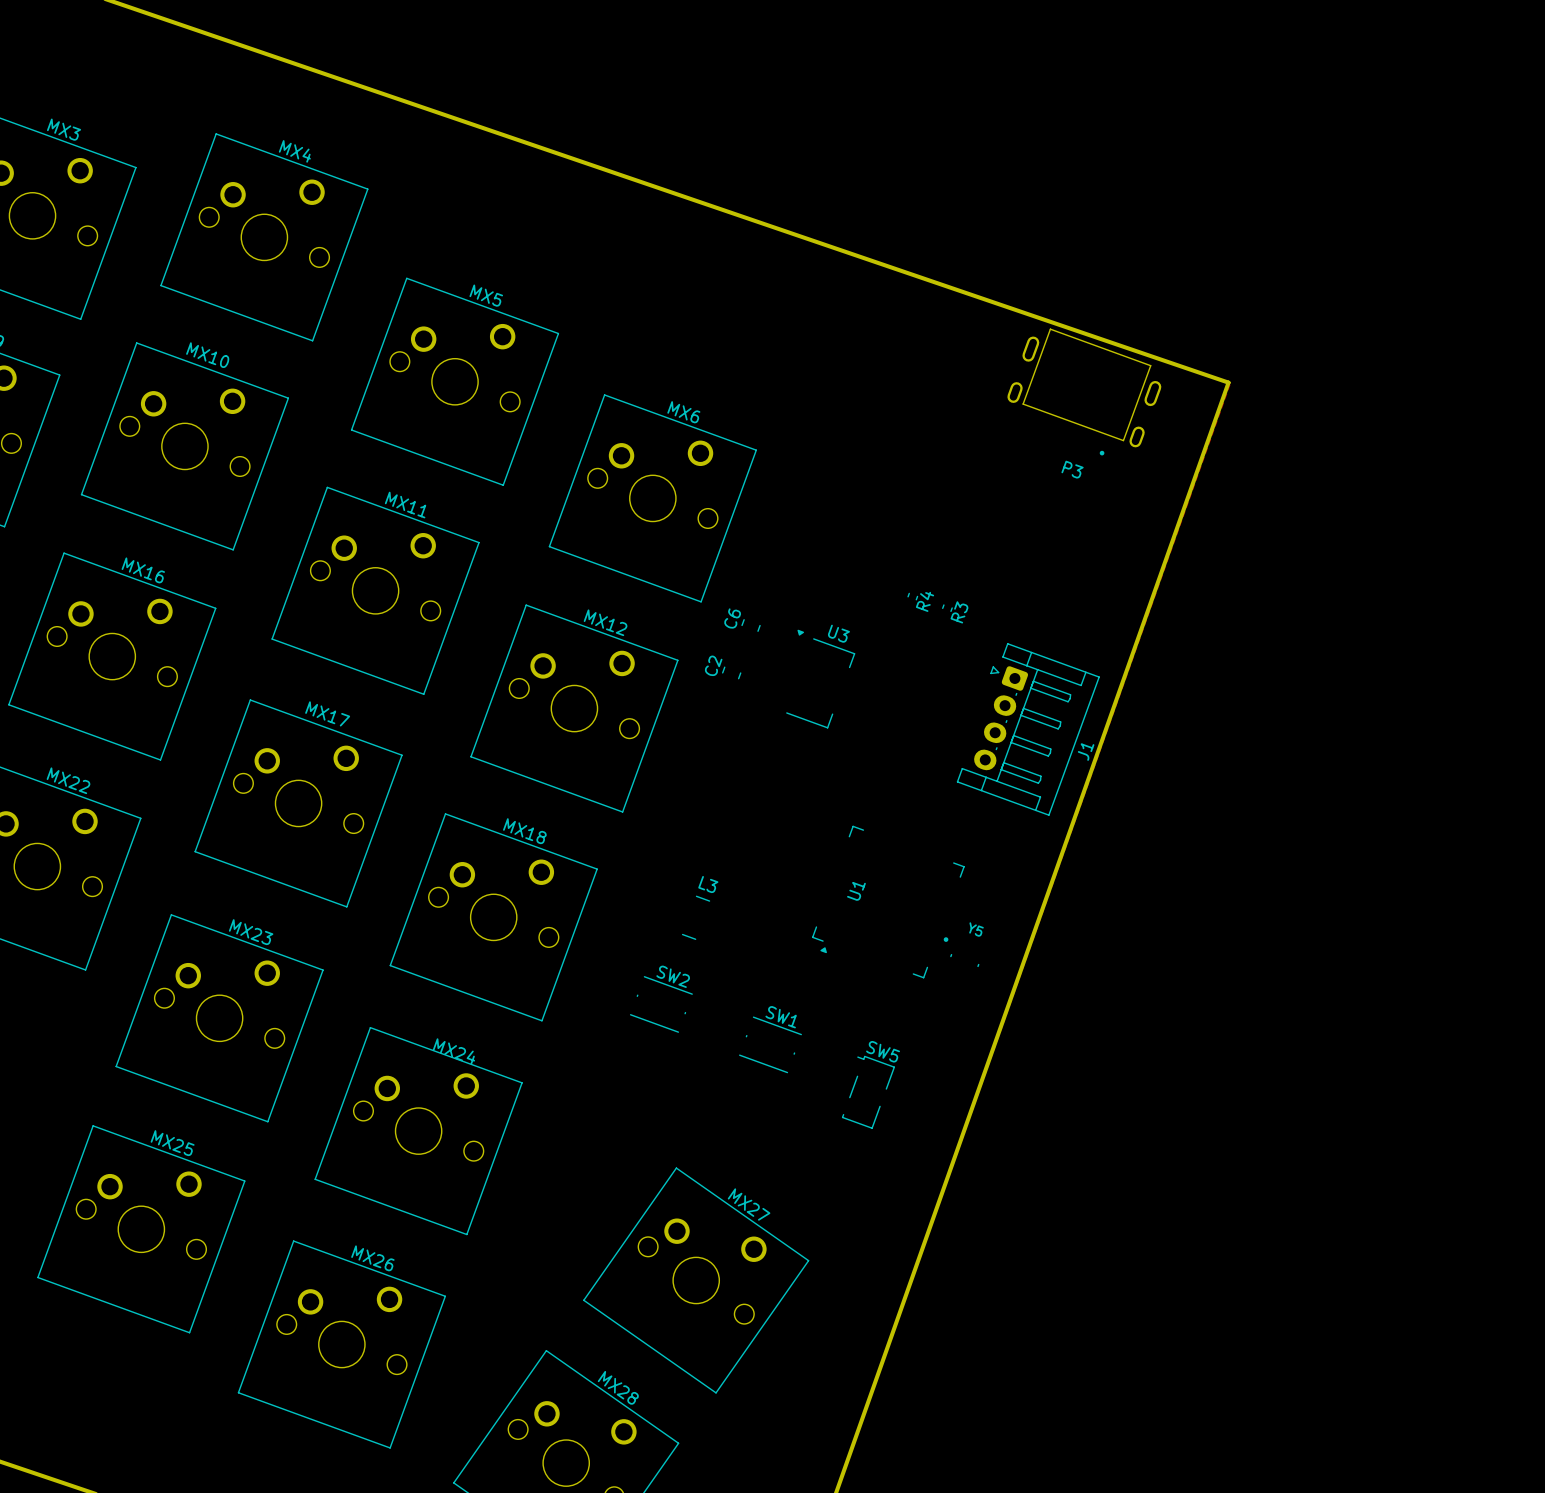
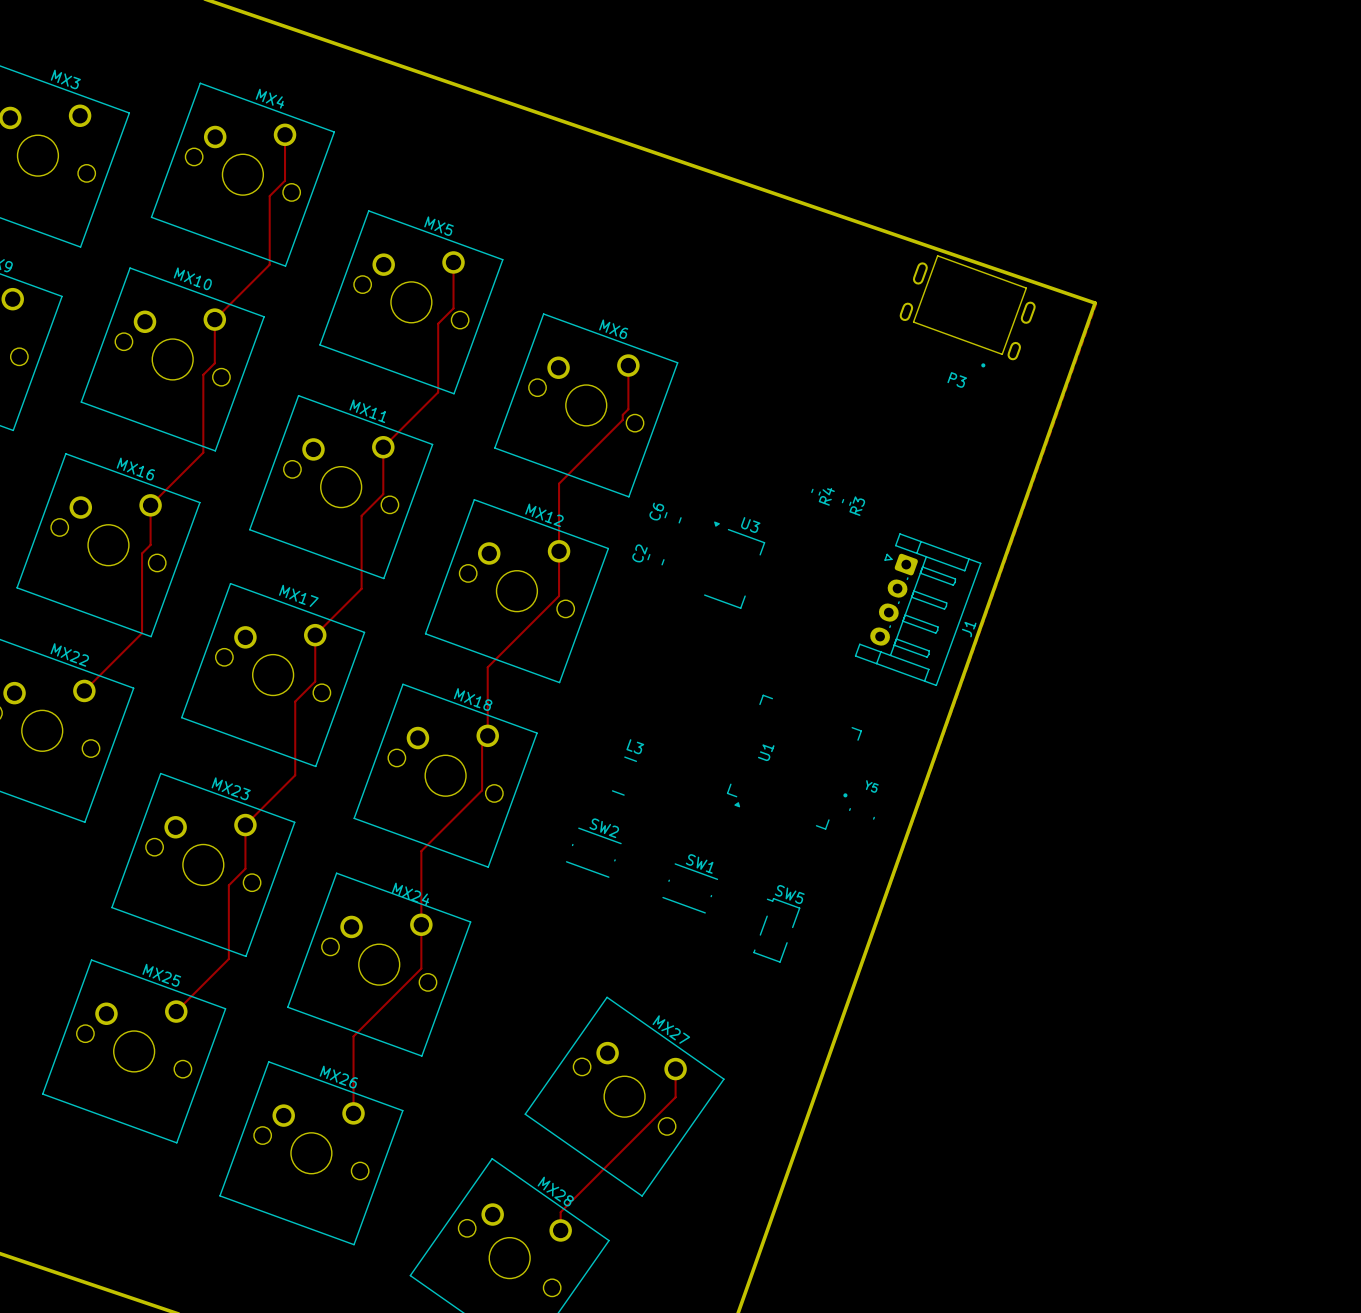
track: none -> (285, 134) (285, 180) (269, 196) (269, 264) (214, 319) (214, 363) (203, 374) (203, 452) (150, 505) (150, 544) (142, 553) (142, 633) (84, 690)
track: none -> (447, 268) (453, 262) (453, 308) (438, 323) (438, 392) (383, 447) (383, 494) (361, 515) (361, 588) (315, 635) (315, 681) (295, 701) (295, 775) (245, 825) (245, 868) (228, 885) (228, 958) (176, 1011)
track: none -> (622, 371) (628, 365) (628, 409) (622, 414) (622, 419) (559, 483) (559, 596) (487, 667) (487, 735) (482, 741) (482, 790) (421, 851) (421, 968) (353, 1036) (353, 1113)
track: none -> (675, 1069) (675, 1097) (560, 1212) (560, 1230)

